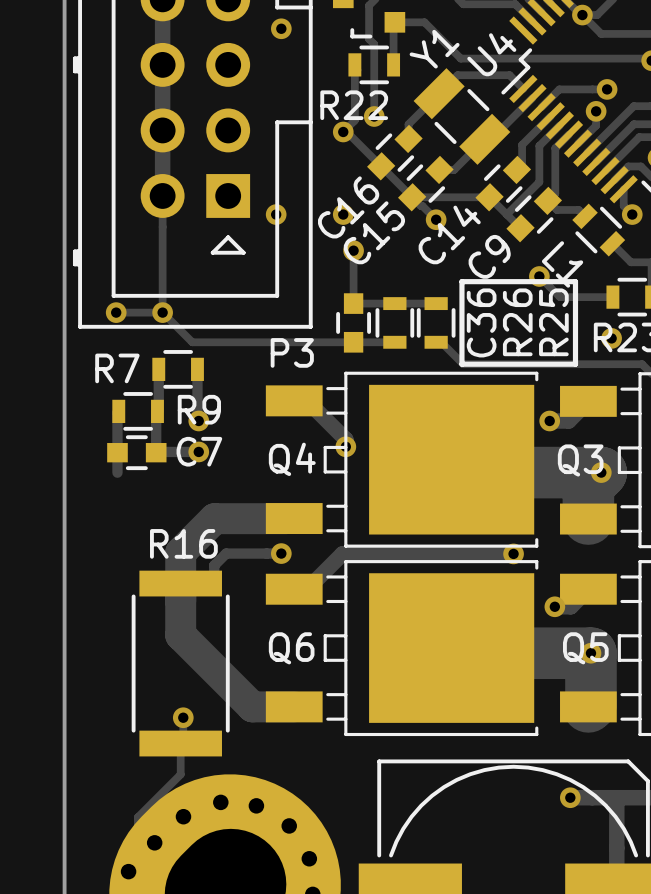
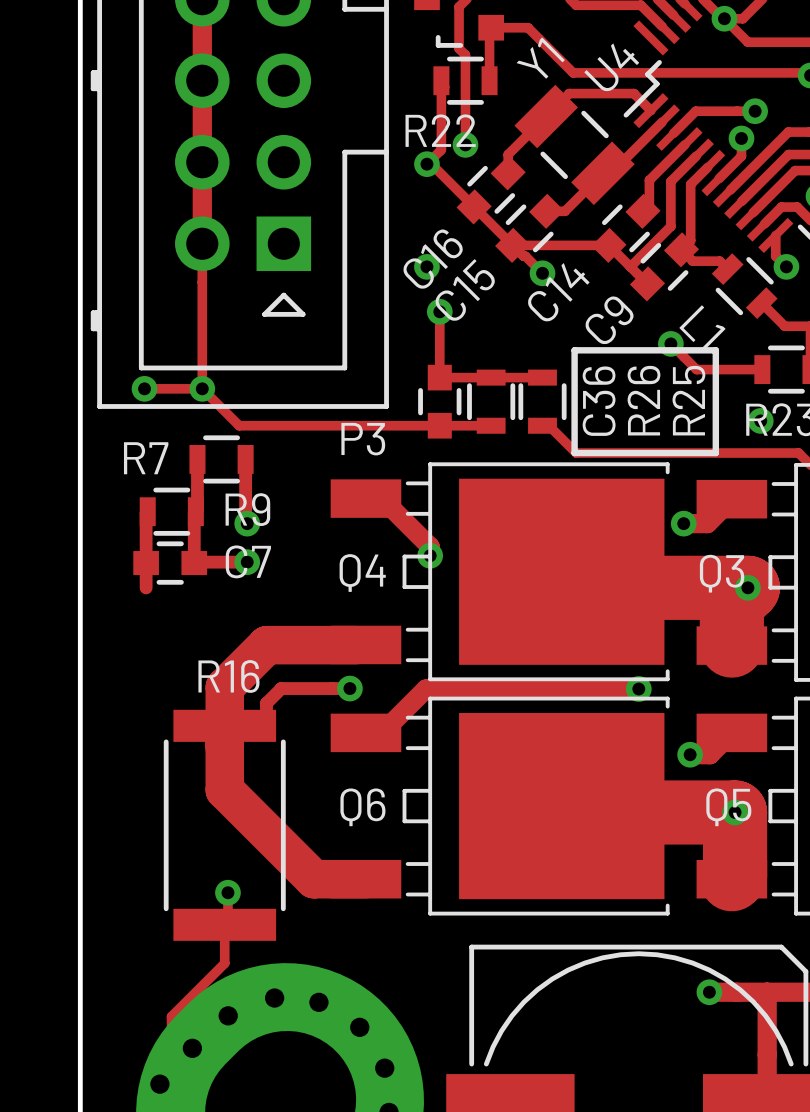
via: (281, 28) -> none
via: (276, 214) -> none

